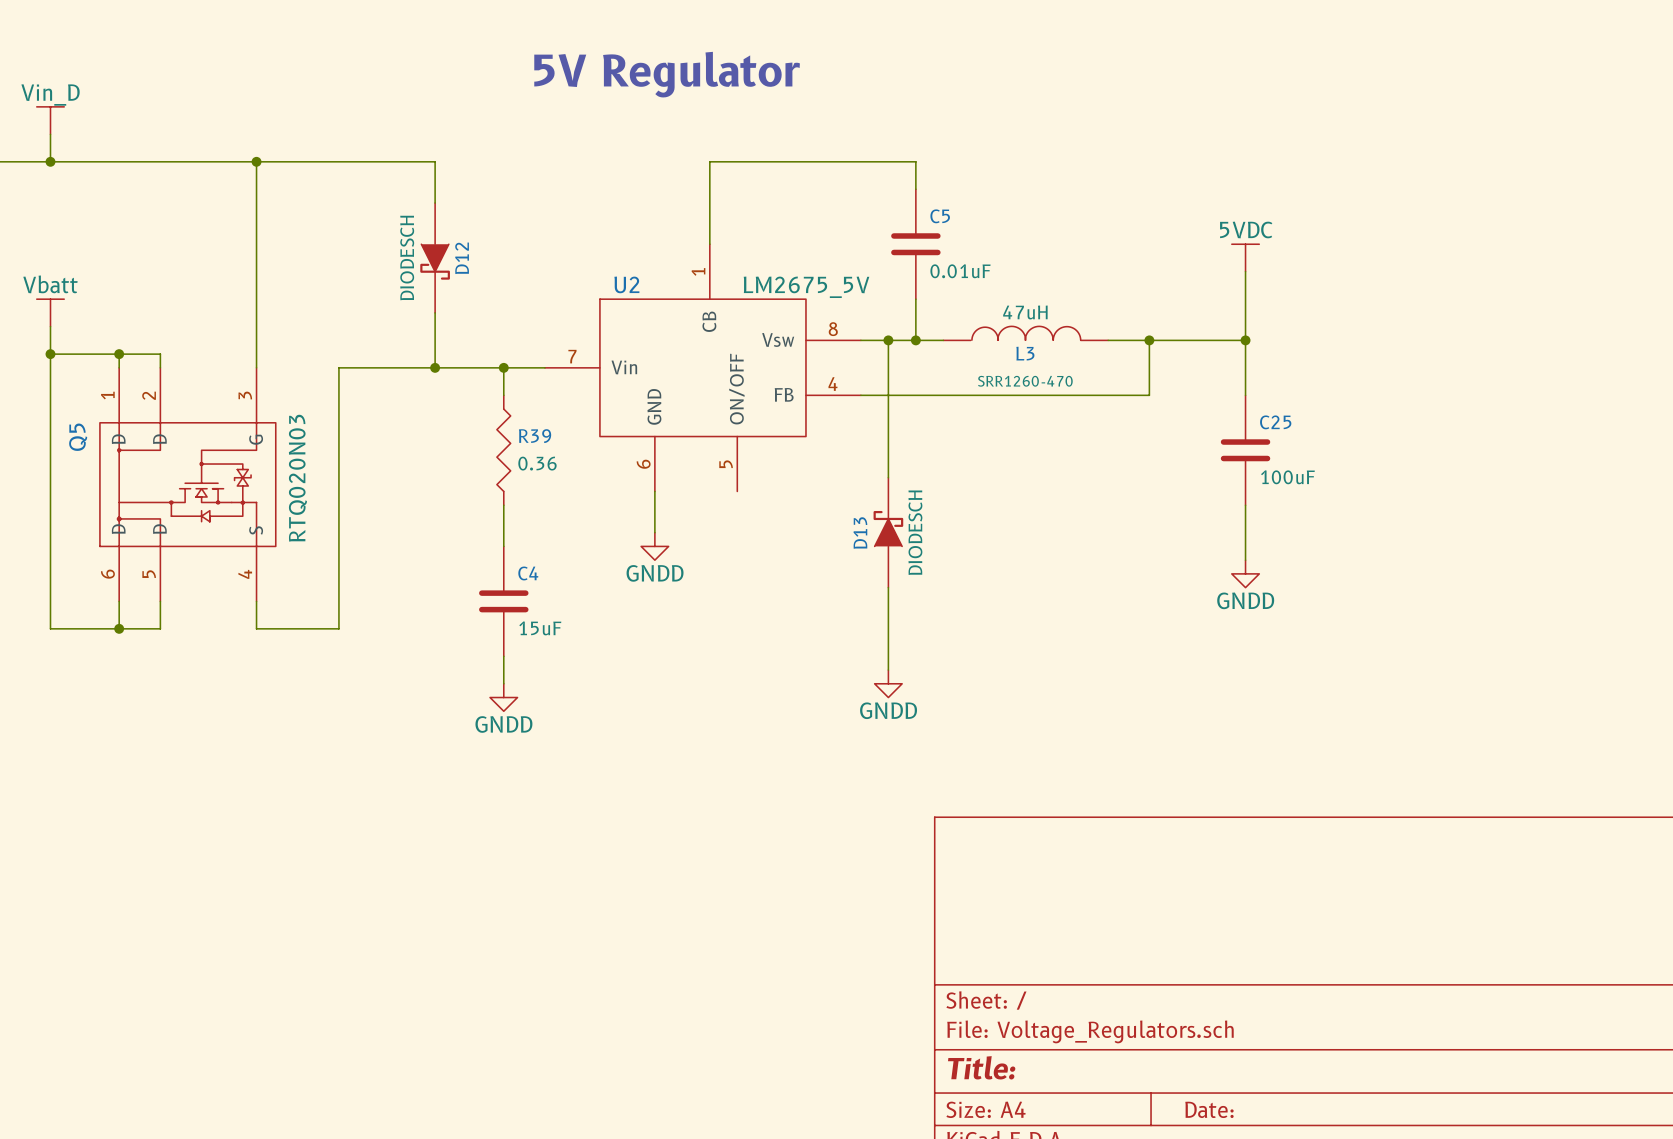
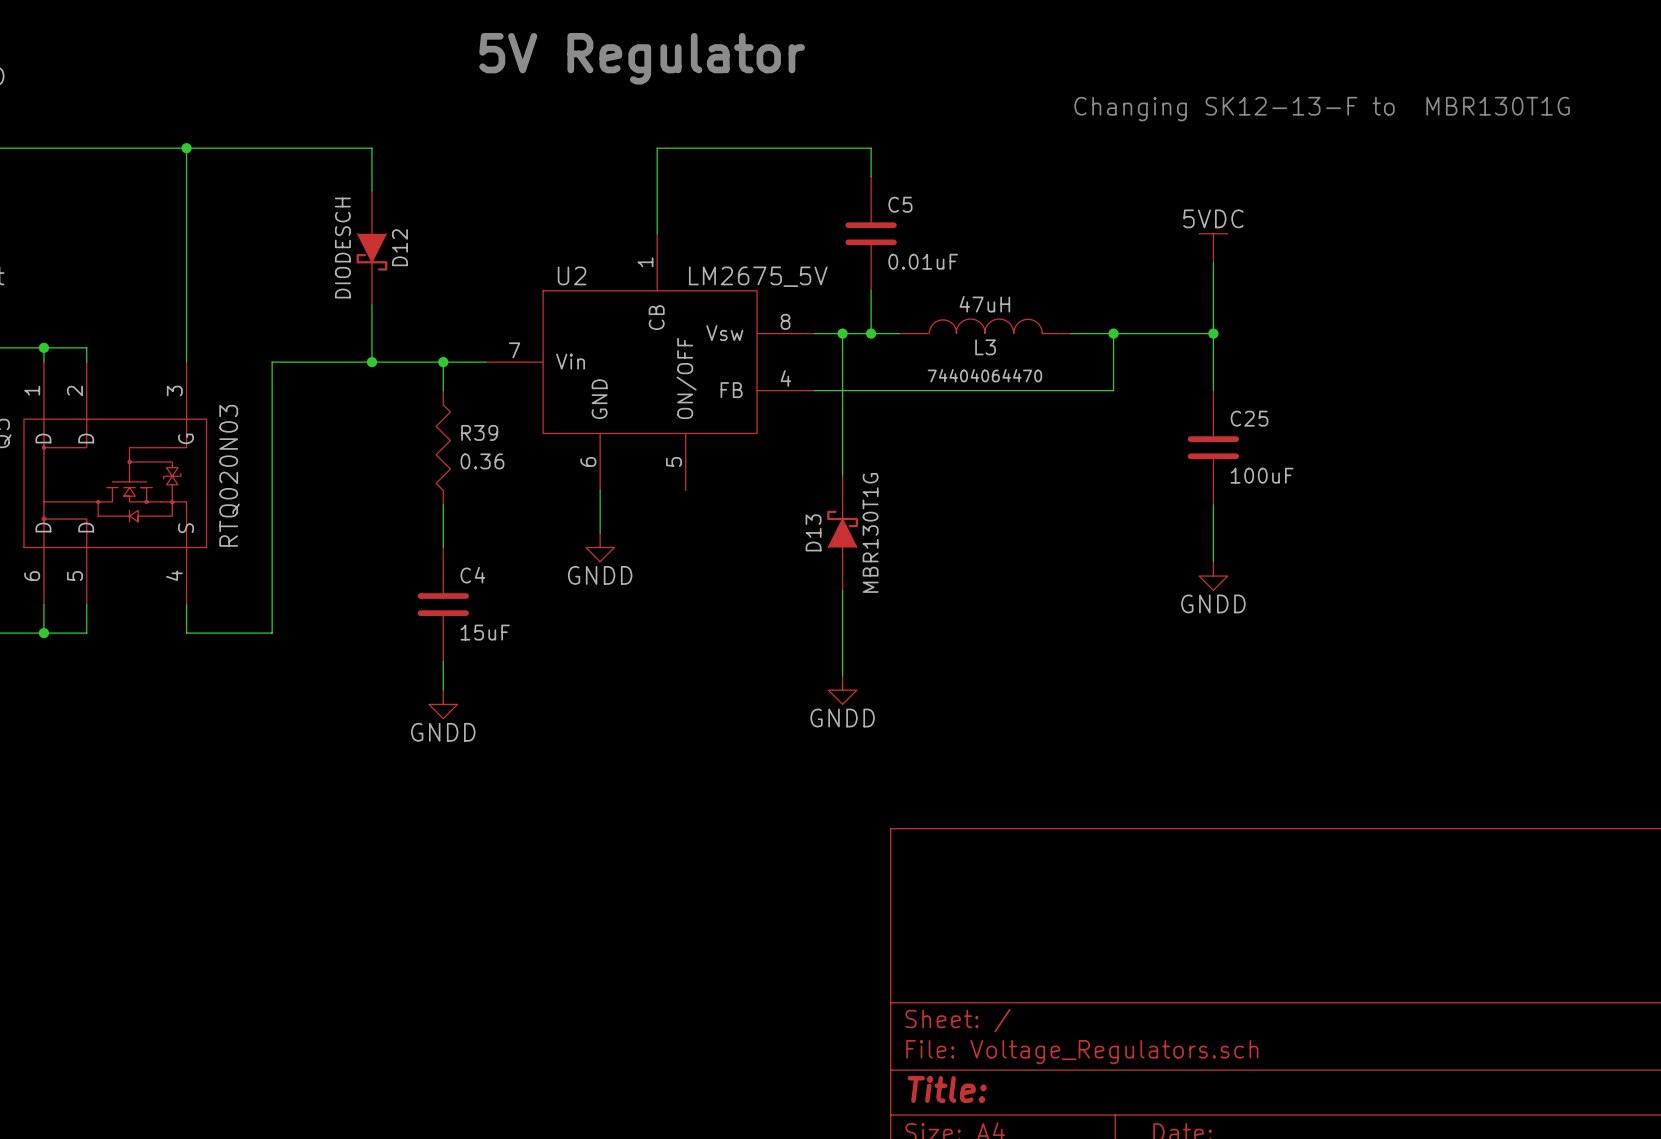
text: none -> Changing SK12-13-F to MBR130T1G (1322, 109)
L3 text: SRR1260-470 (1025, 381) -> 74404064470 (984, 375)
D13 value: DIODESCH (915, 532) -> MBR130T1G (870, 532)

